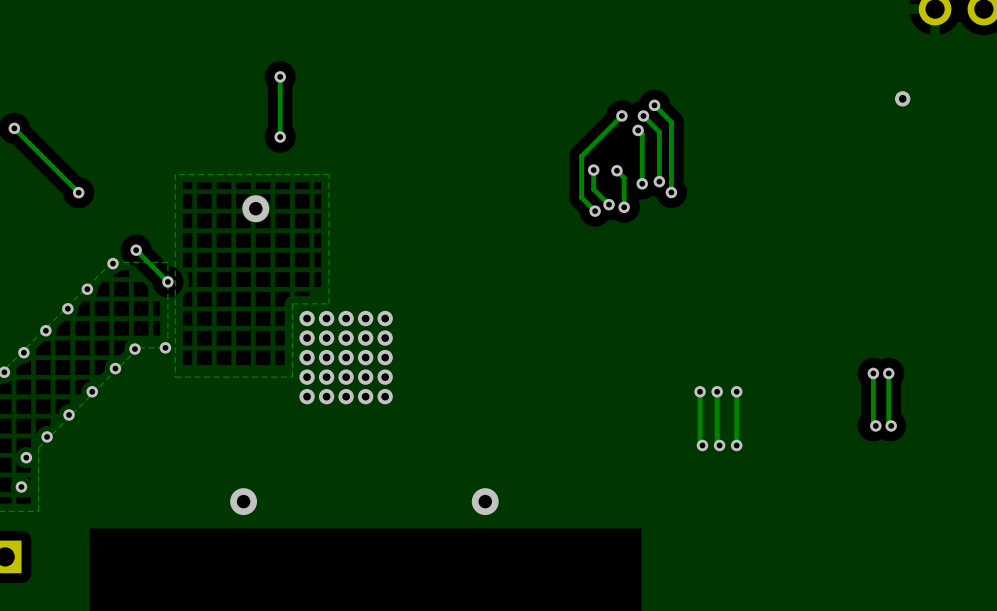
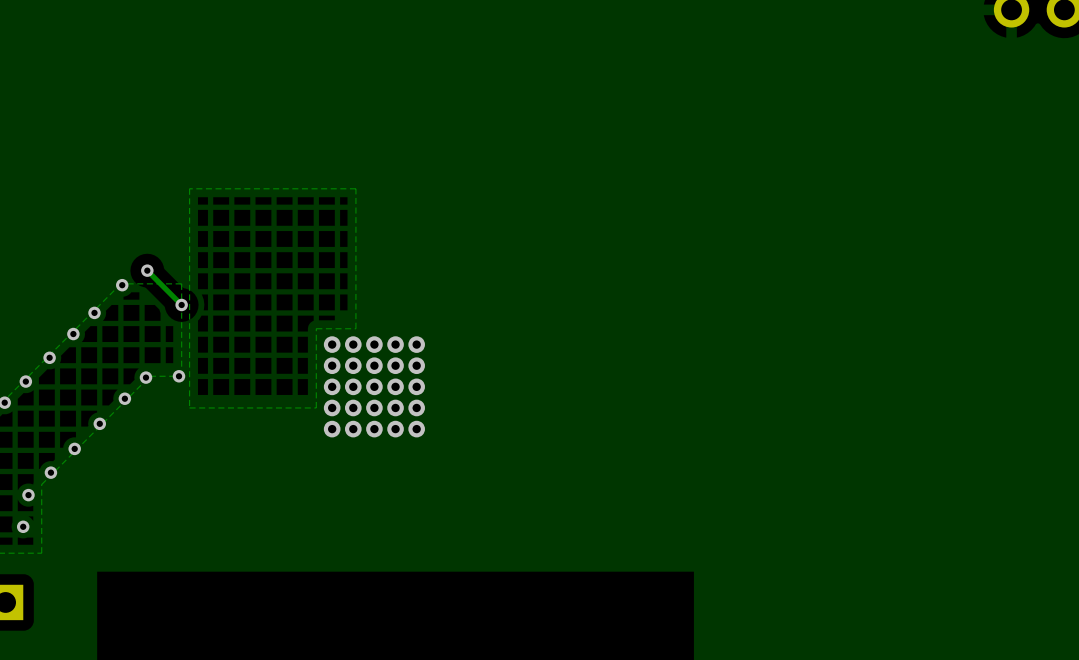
track: (280, 76) (280, 137) -> none
via: (280, 76) -> none
via: (902, 98) -> none
track: (654, 105) (671, 122) (671, 192) -> none
via: (654, 105) -> none
track: (621, 115) (581, 156) (581, 197) (595, 211) -> none
via: (621, 115) -> none
track: (643, 115) (659, 131) (659, 181) -> none
via: (643, 115) -> none
track: (14, 128) (78, 192) -> none
via: (14, 128) -> none
track: (638, 130) (642, 134) (642, 183) -> none
via: (638, 130) -> none
via: (280, 137) -> none
track: (593, 170) (593, 189) (609, 204) -> none
via: (593, 170) -> none
track: (616, 170) (624, 177) (624, 207) -> none
via: (616, 170) -> none
via: (659, 181) -> none
via: (642, 183) -> none
via: (78, 192) -> none
via: (671, 192) -> none
via: (609, 204) -> none
via: (624, 207) -> none
via: (255, 208) -> none
via: (595, 211) -> none
track: (873, 373) (873, 423) (875, 425) -> none
via: (873, 373) -> none
track: (888, 373) (888, 423) (891, 425) -> none
via: (888, 373) -> none
track: (700, 391) (700, 443) (702, 445) -> none
via: (700, 391) -> none
track: (717, 391) (717, 443) (719, 445) -> none
via: (717, 391) -> none
track: (736, 391) (736, 445) -> none
via: (736, 391) -> none
via: (875, 425) -> none
via: (891, 425) -> none
via: (702, 445) -> none
via: (719, 445) -> none
via: (736, 445) -> none
via: (243, 501) -> none
via: (485, 501) -> none

